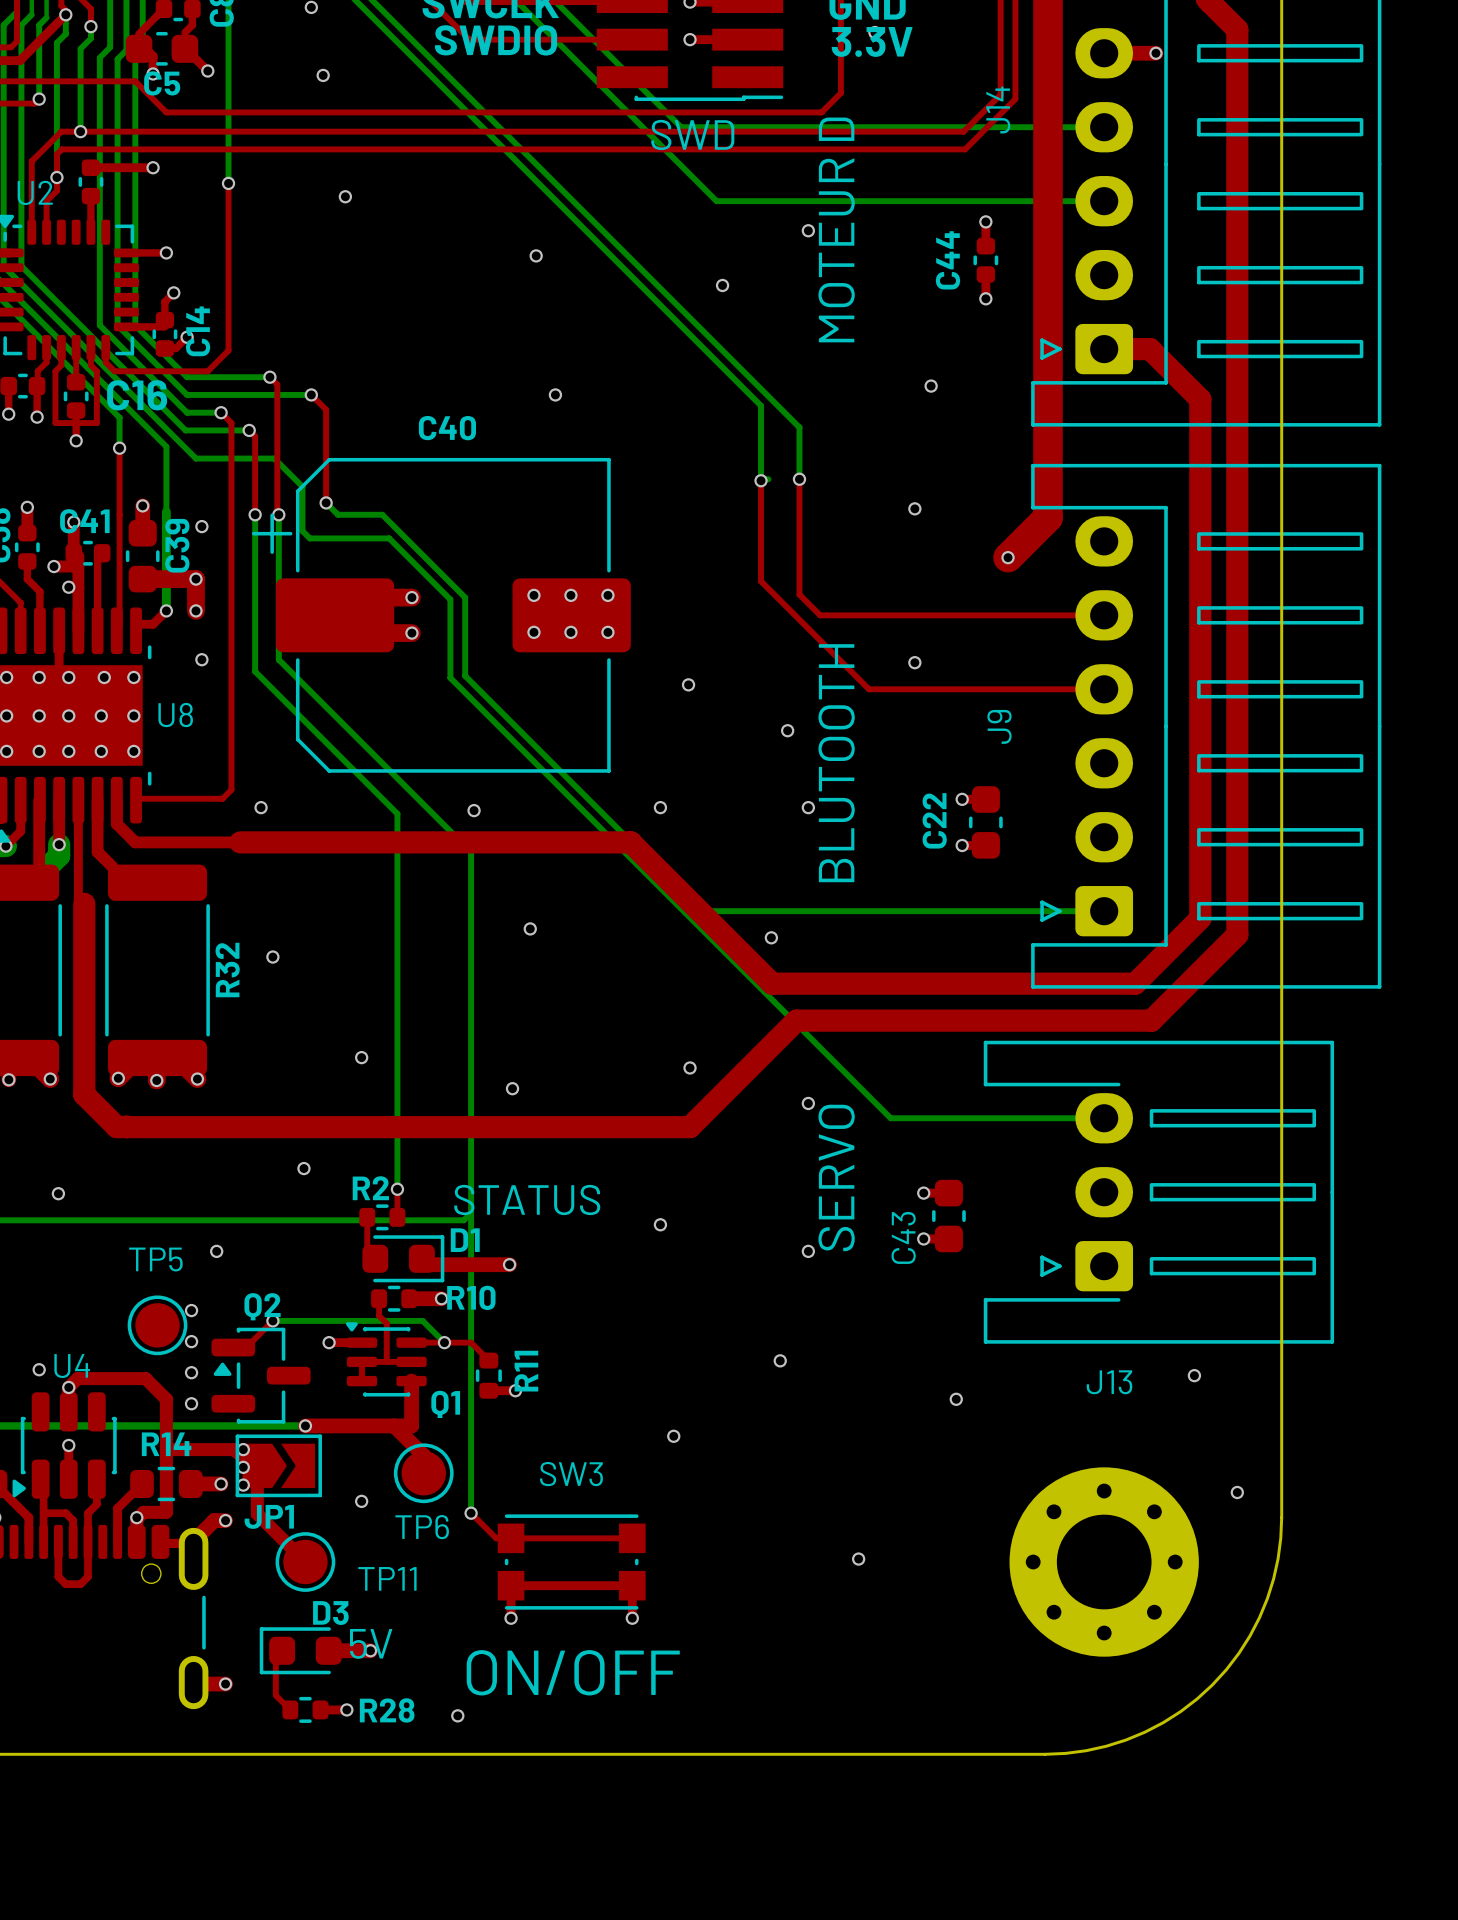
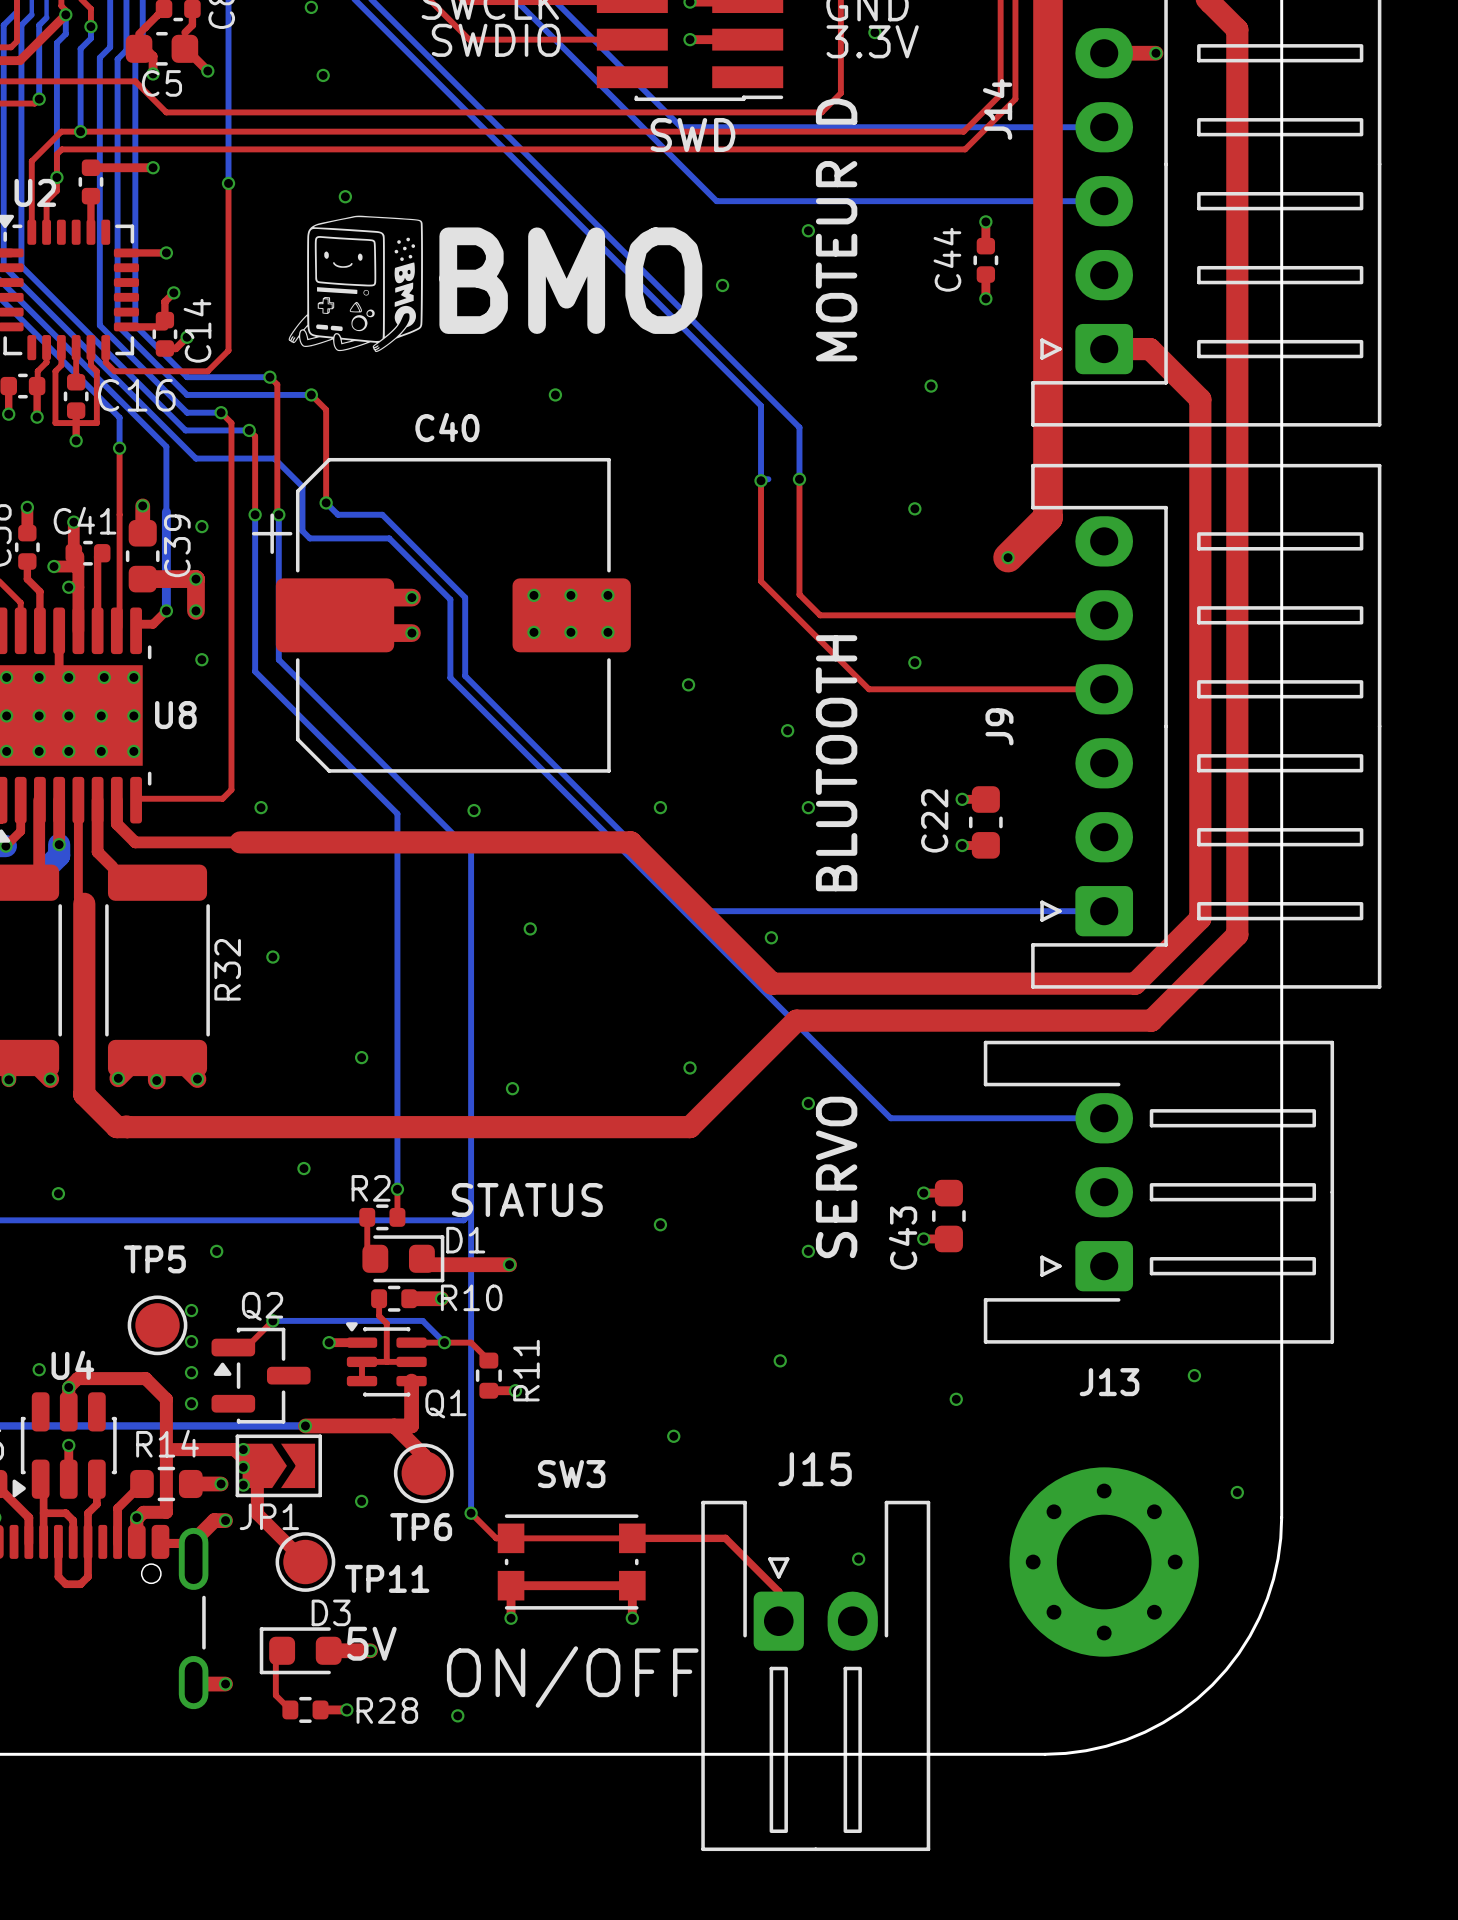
drawing: none -> [288, 215, 423, 353]
text: none -> BMO (570, 280)
top track: none -> (632, 1538) (725, 1538) (778, 1591) (778, 1621)
J15: none -> (815, 1675)

